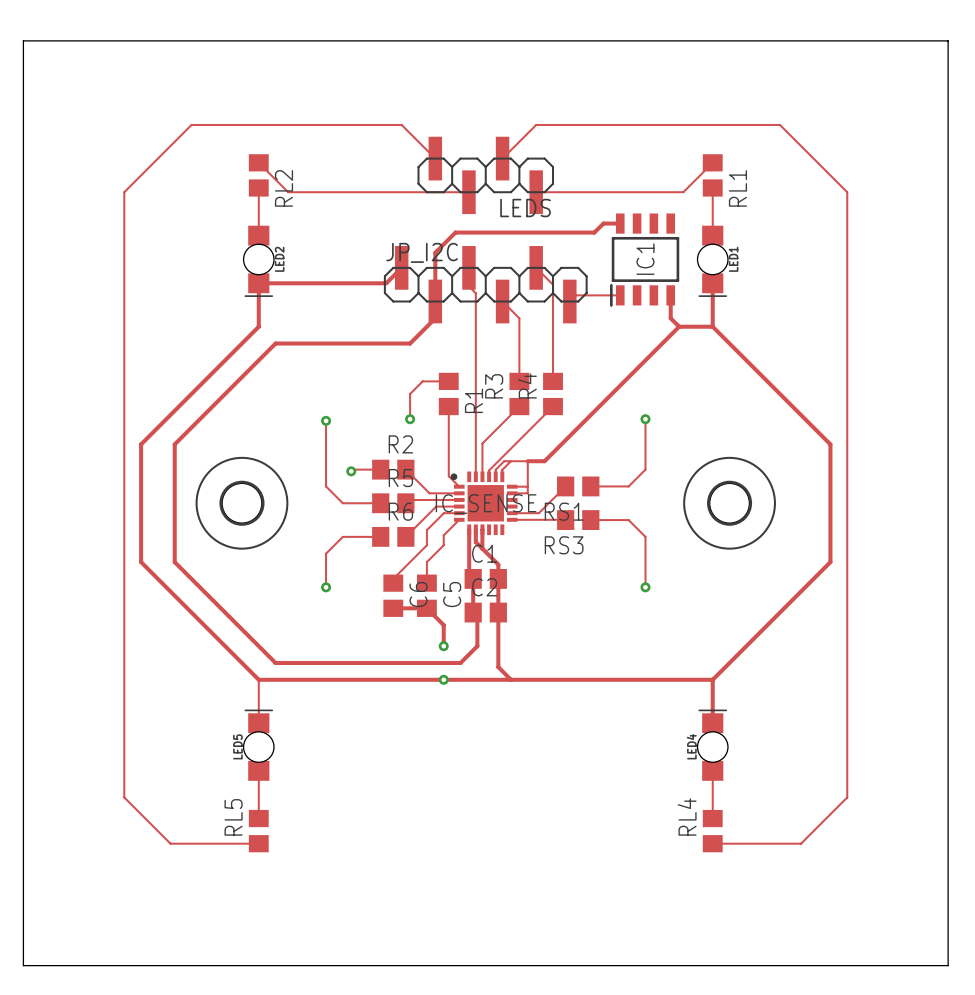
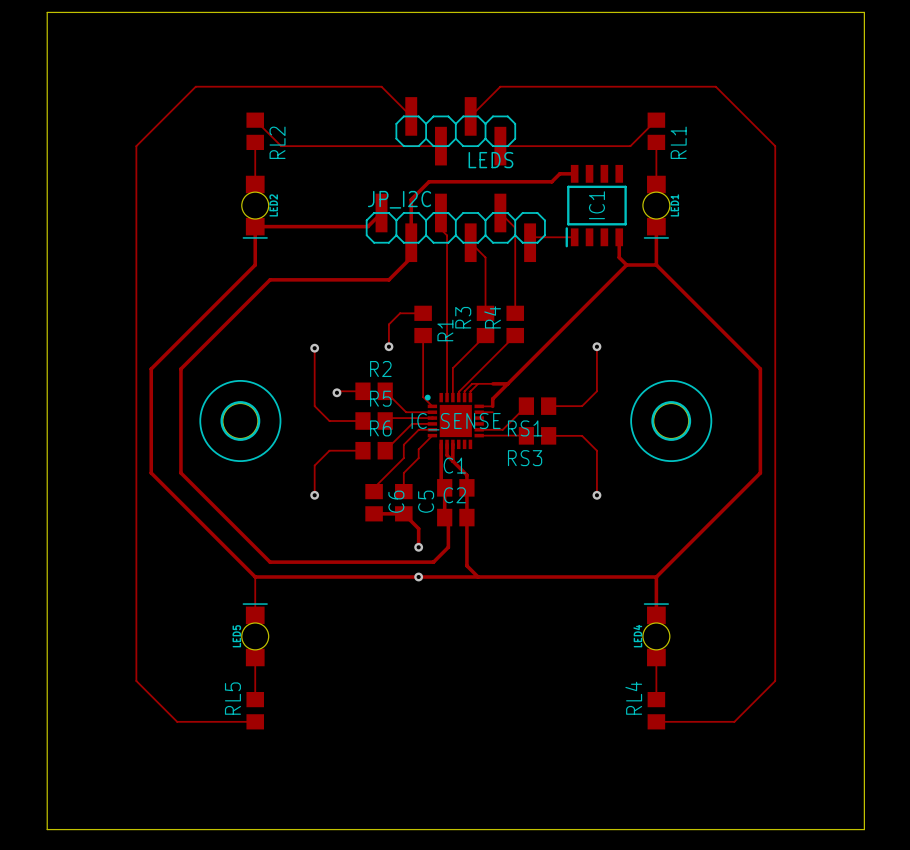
track: (527, 461) (527, 493) -> none
track: none -> (507, 383) (492, 398) (492, 406)

